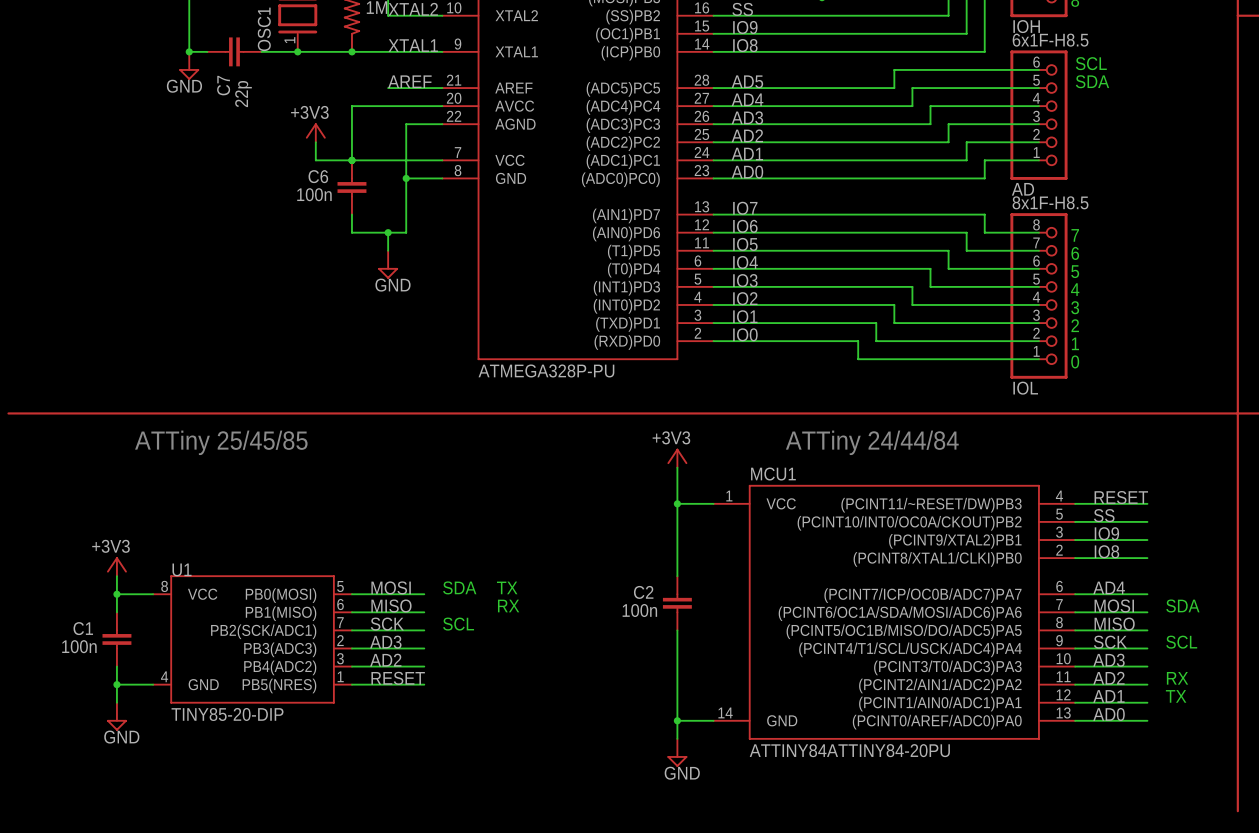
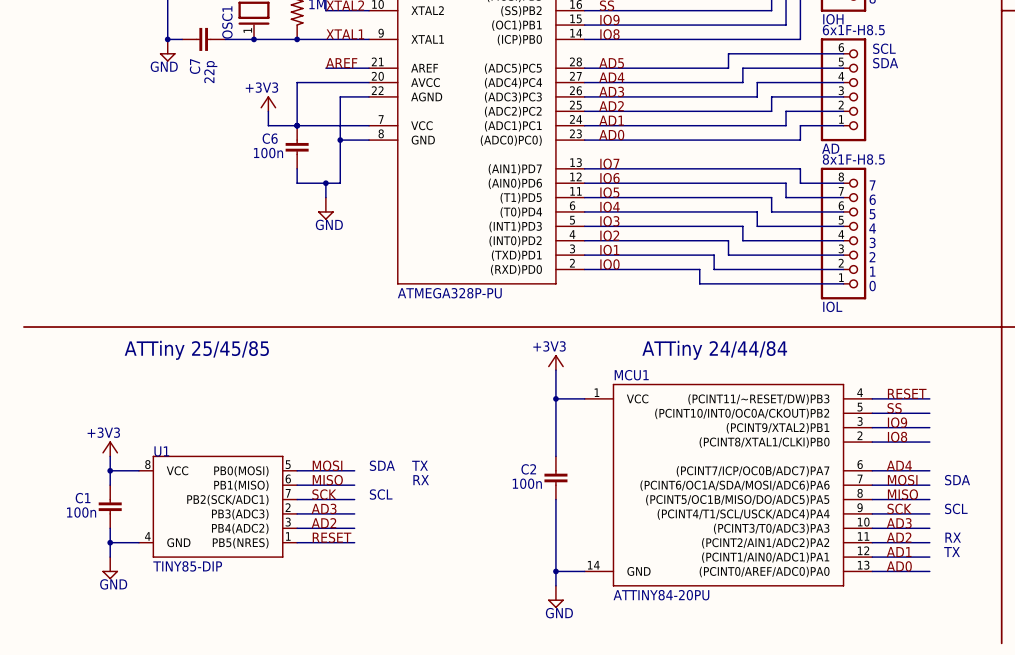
U1 value: TINY85-20-DIP (227, 714) -> TINY85-DIP (187, 566)
MCU1 value: ATTINY84ATTINY84-20PU (849, 750) -> ATTINY84-20PU (661, 595)

